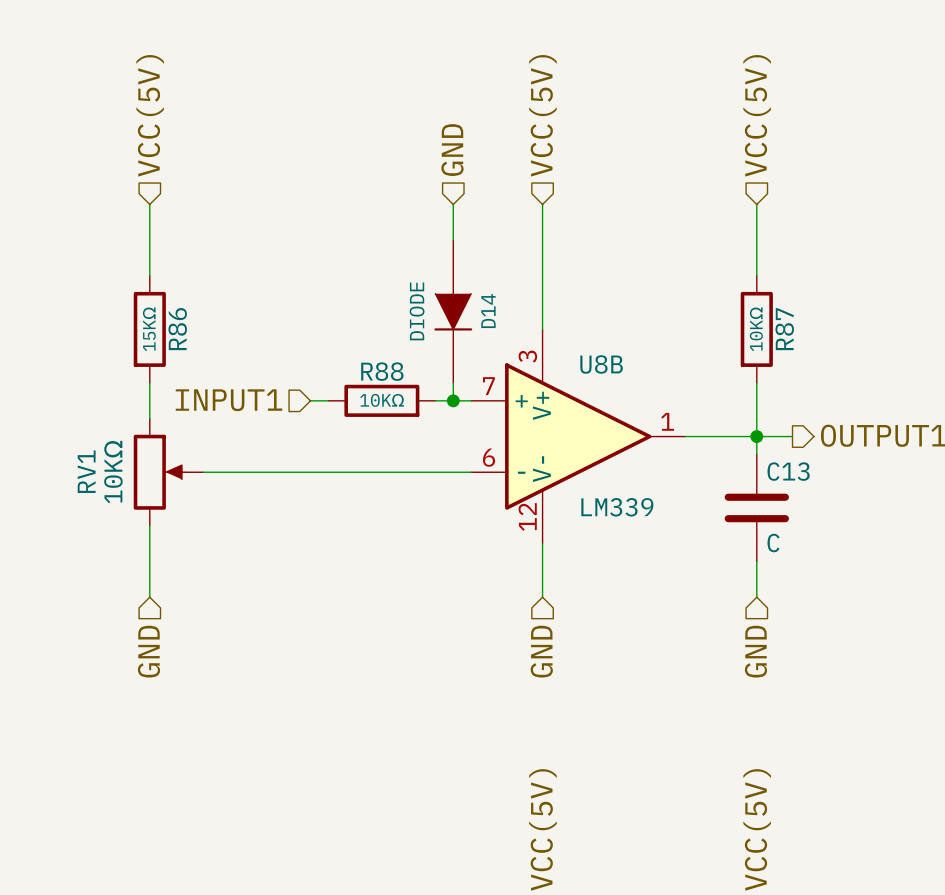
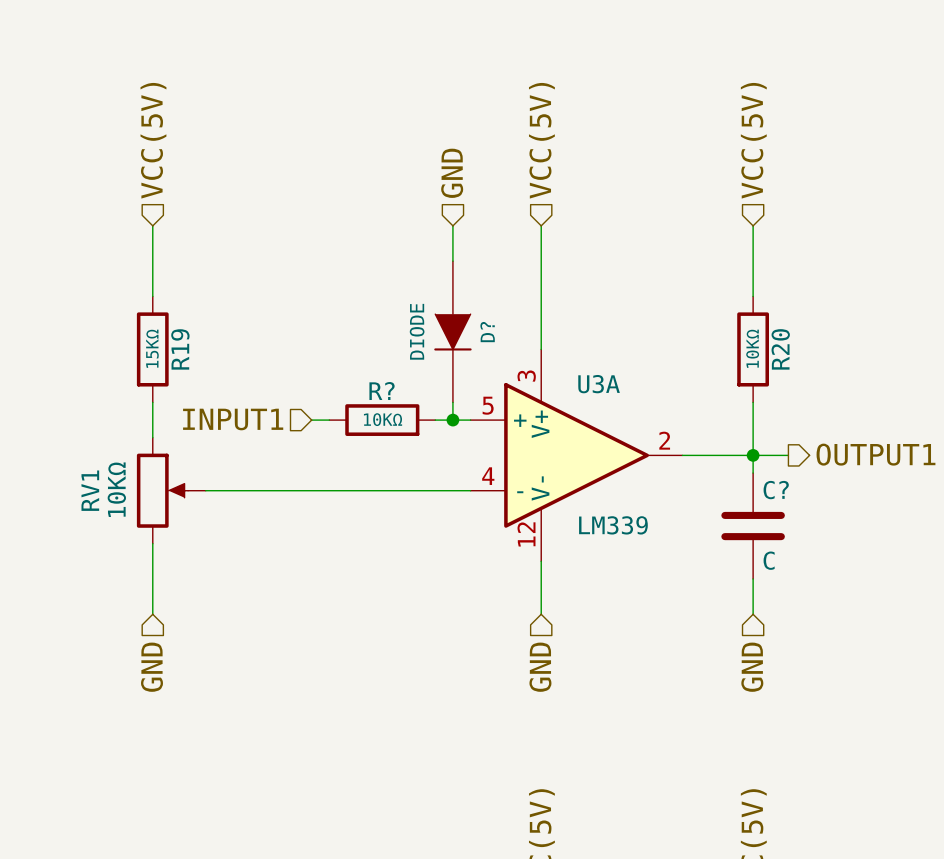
D14 name: D14 (488, 310) -> D? (487, 332)
R86 name: R86 (177, 329) -> R19 (180, 349)
R87 name: R87 (784, 329) -> R20 (780, 349)
U8B name: U8B (601, 364) -> U3A (599, 384)
R88 name: R88 (382, 371) -> R? (382, 391)
U8B pin number: 7 (488, 386) -> 5 (488, 405)
U8B pin number: 1 (667, 421) -> 2 (664, 440)
U8B pin number: 6 (489, 457) -> 4 (488, 476)
C13 name: C13 (788, 471) -> C? (776, 490)

